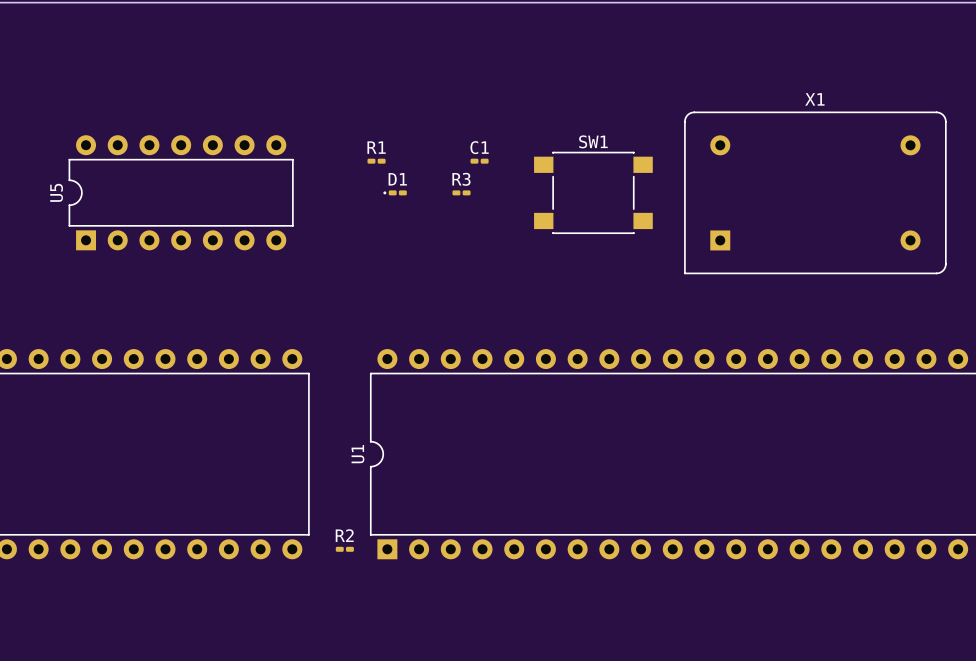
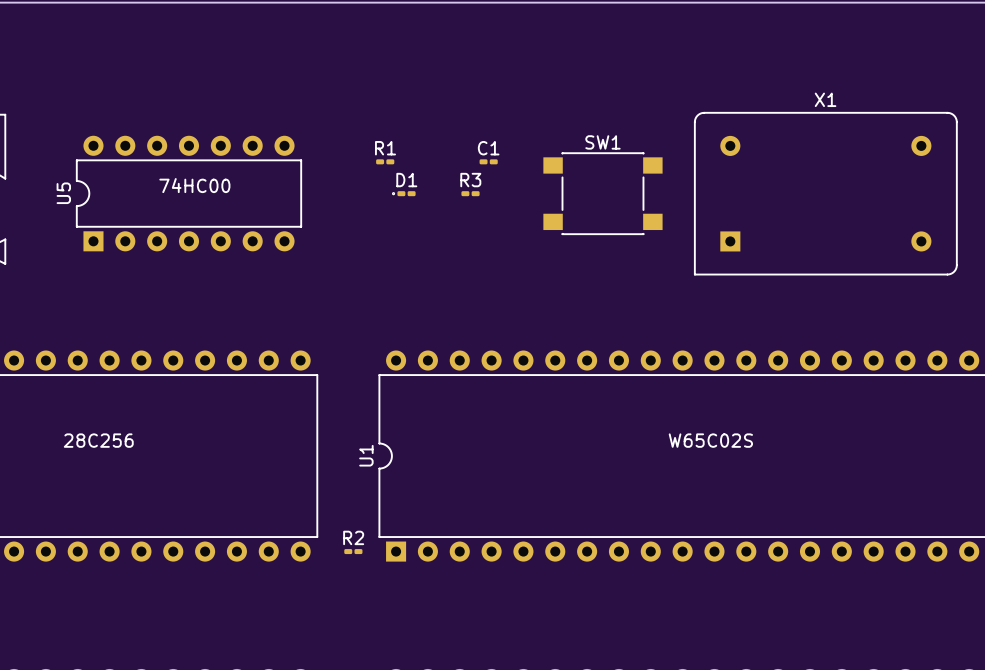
text: none -> 74HC00 (194, 185)
text: none -> 28C256 (98, 440)
text: none -> W65C02S (710, 440)

